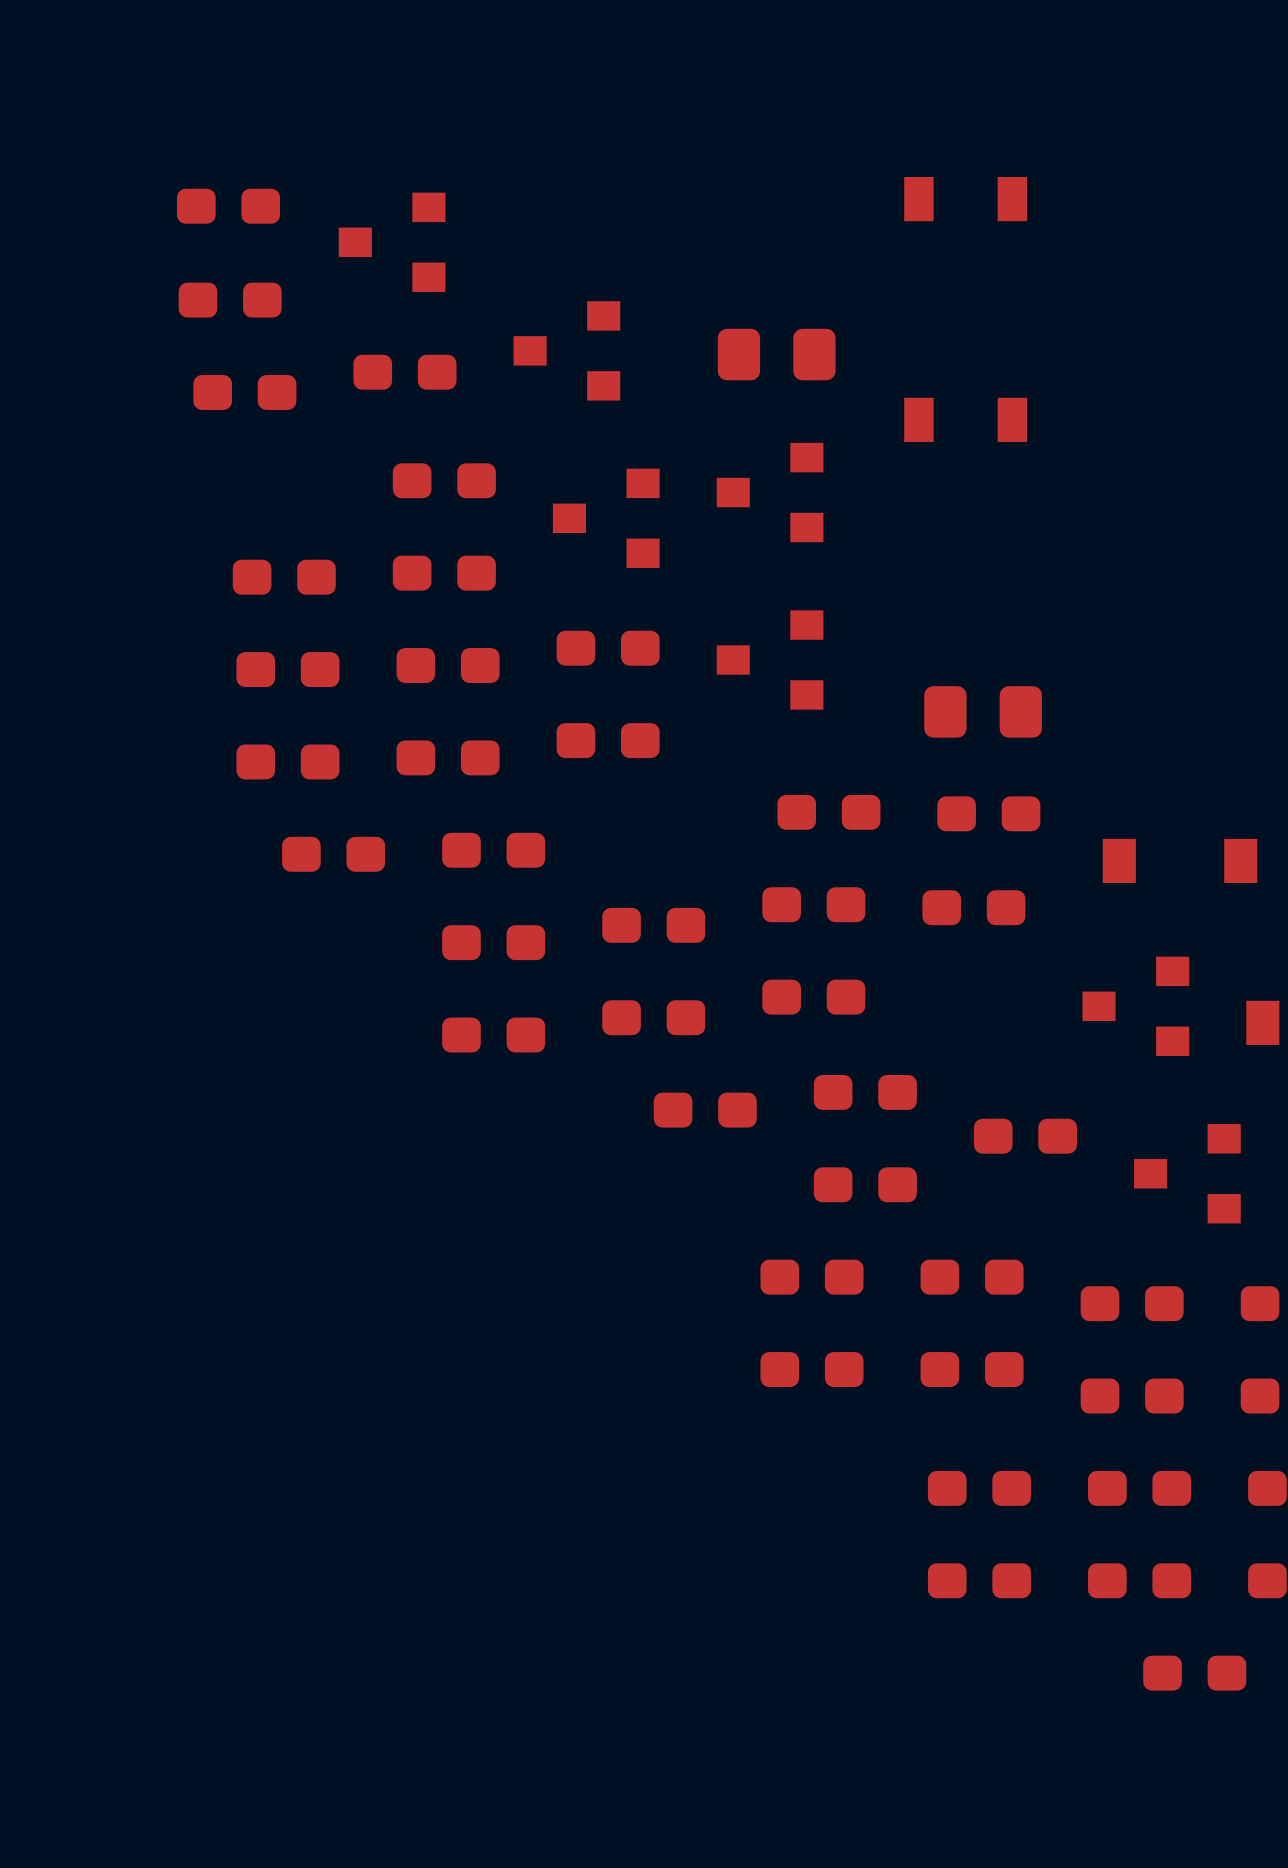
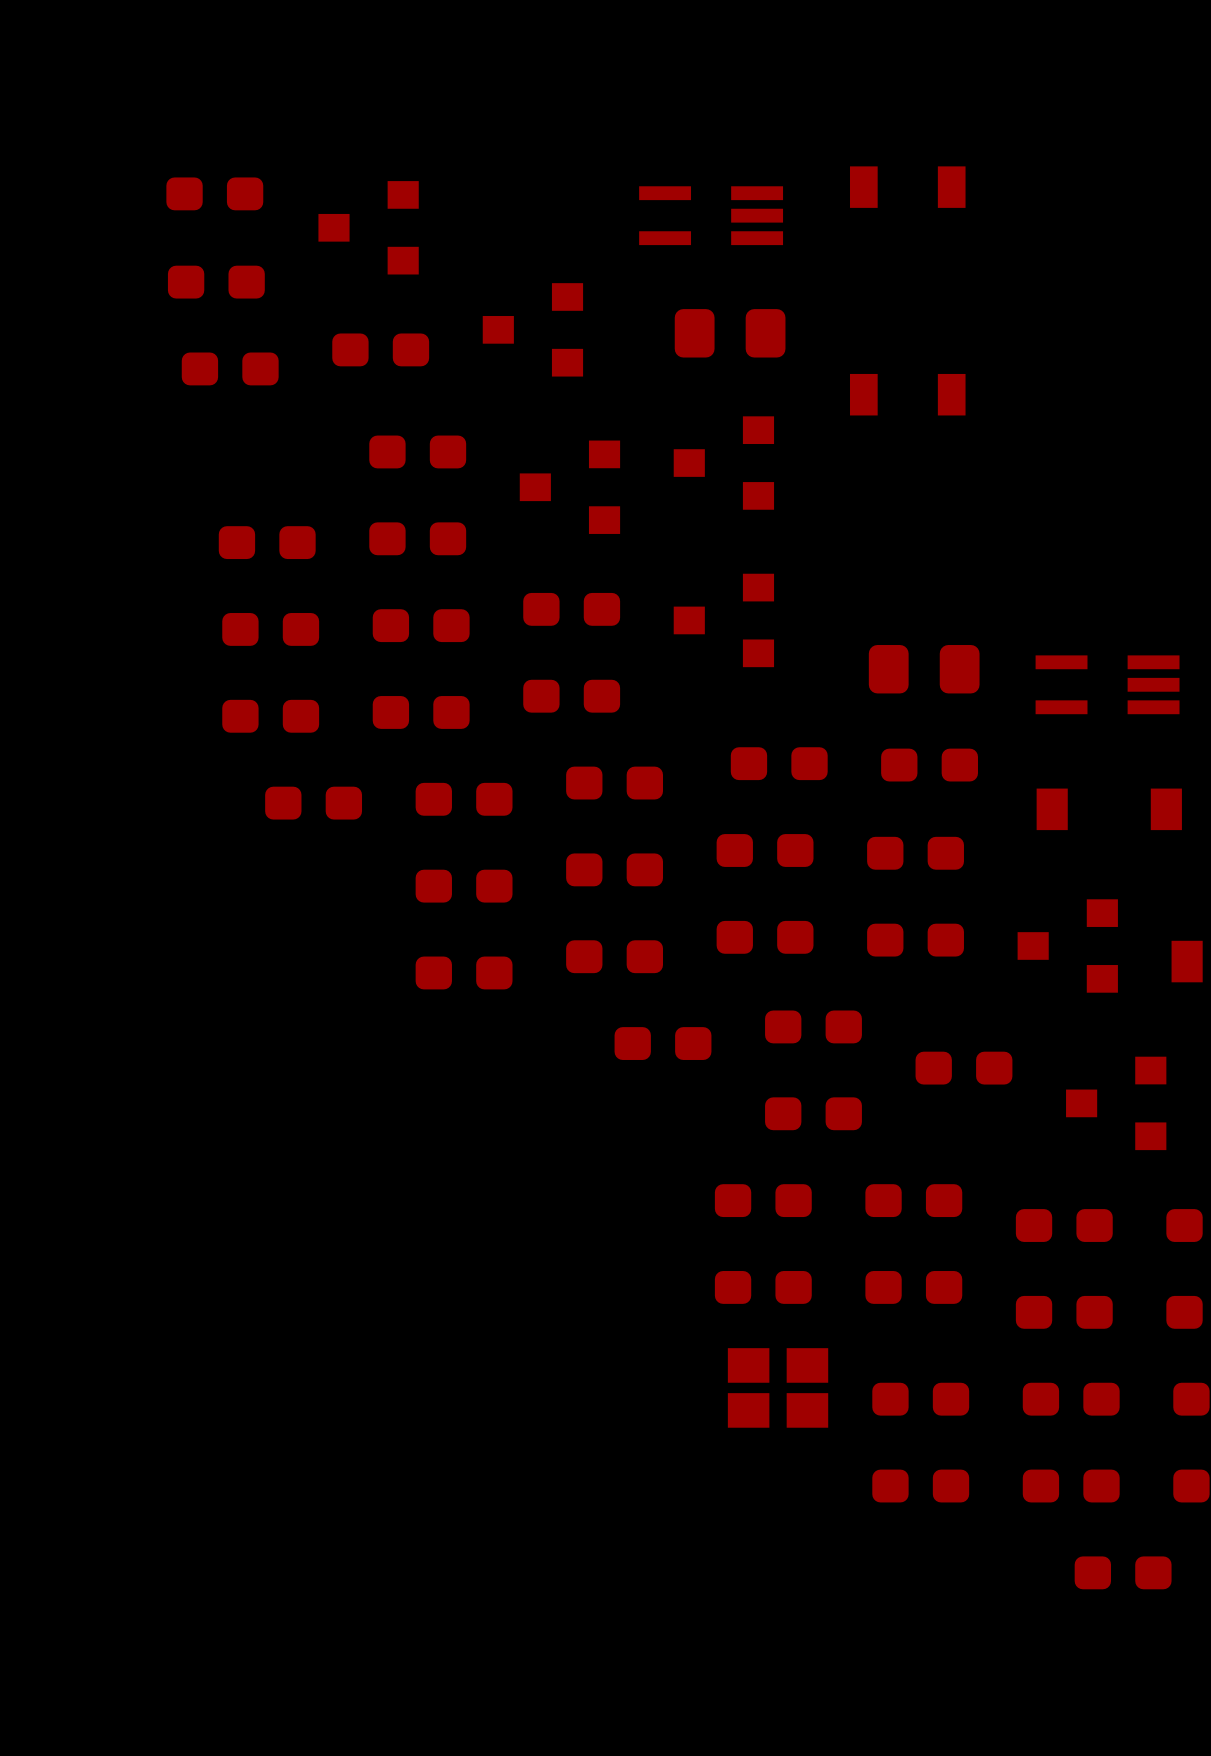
part: none -> (711, 215)
part: none -> (1107, 684)
part: none -> (614, 783)
part: none -> (915, 940)
part: none -> (778, 1387)

